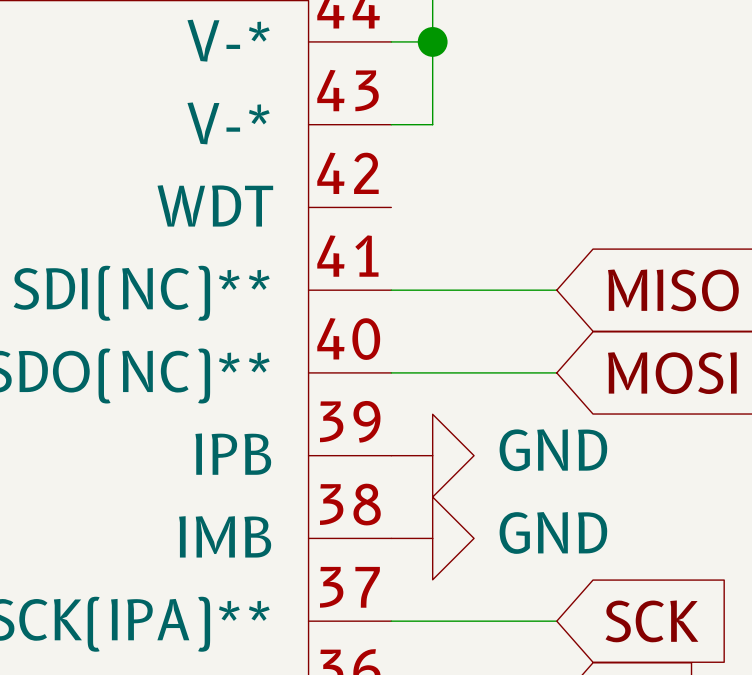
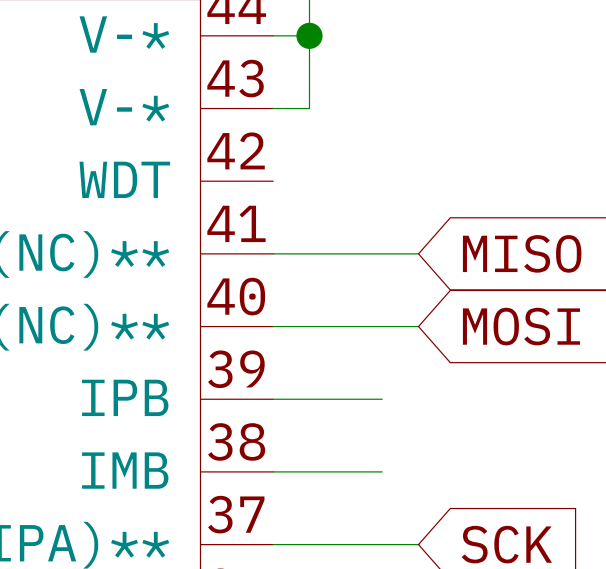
wire: none -> (273, 399) (382, 399)
power symbol: GND (432, 455) -> none
wire: none -> (273, 471) (382, 471)
power symbol: GND (432, 538) -> none

